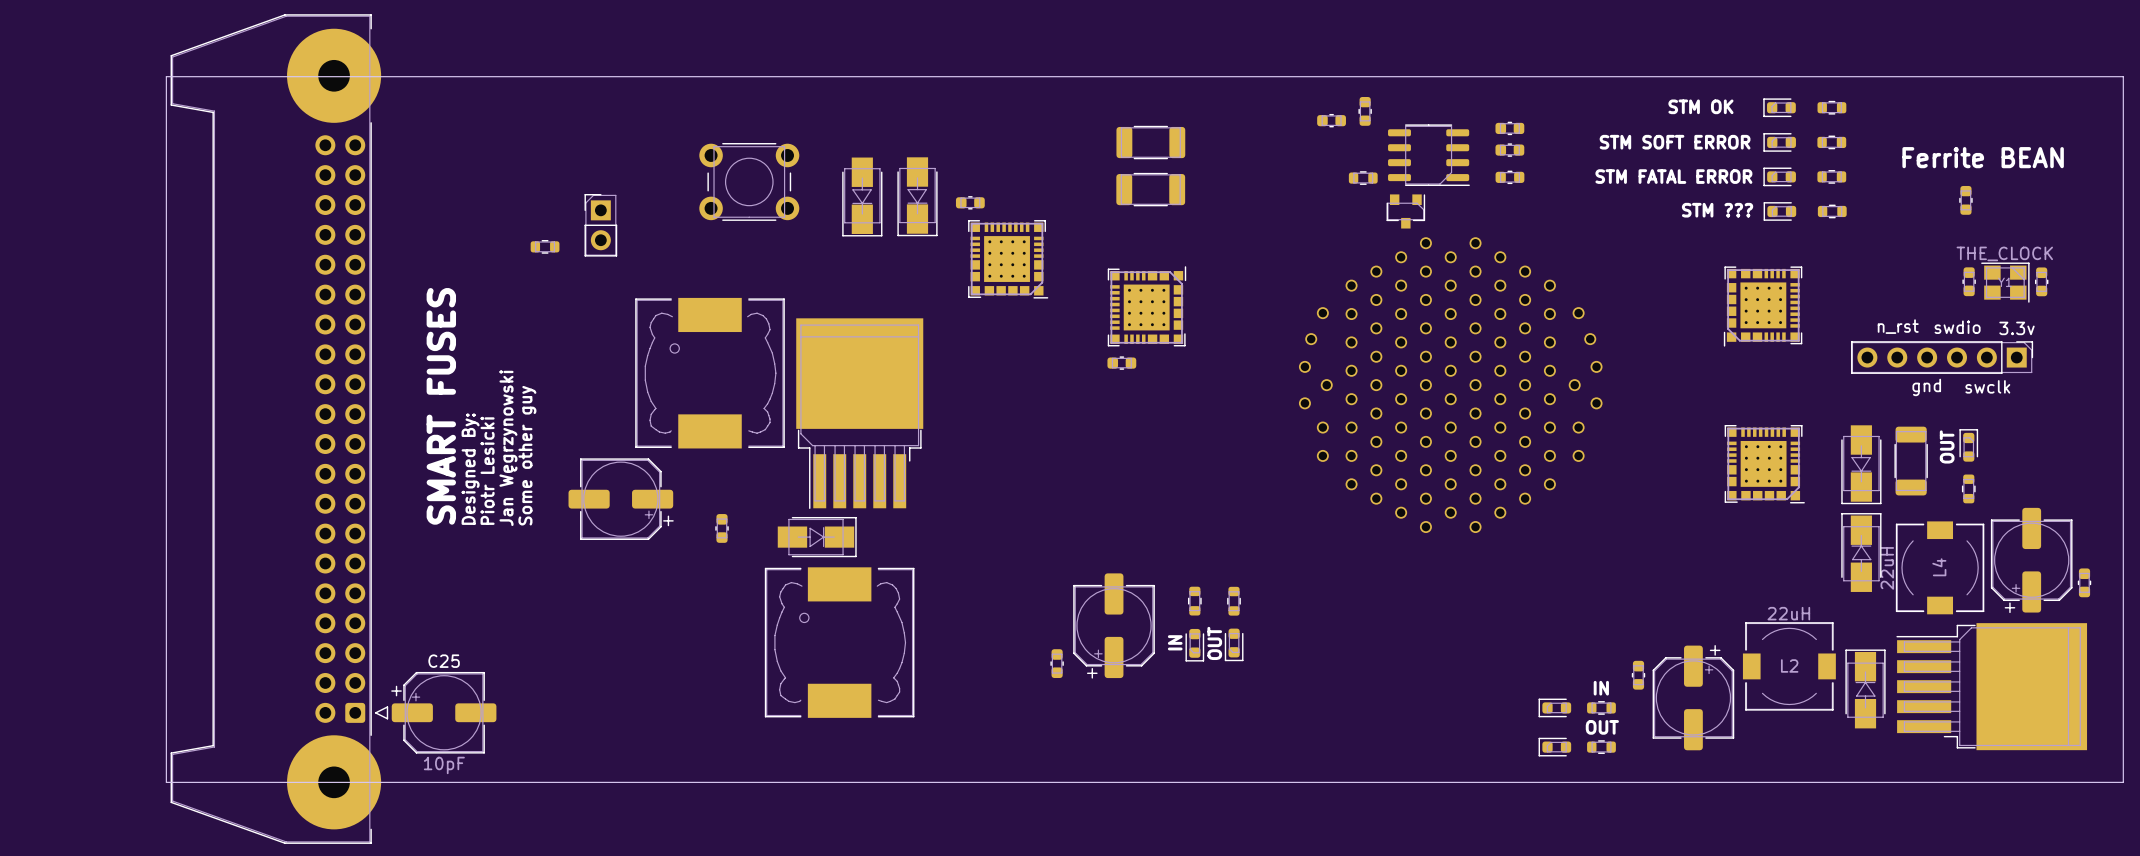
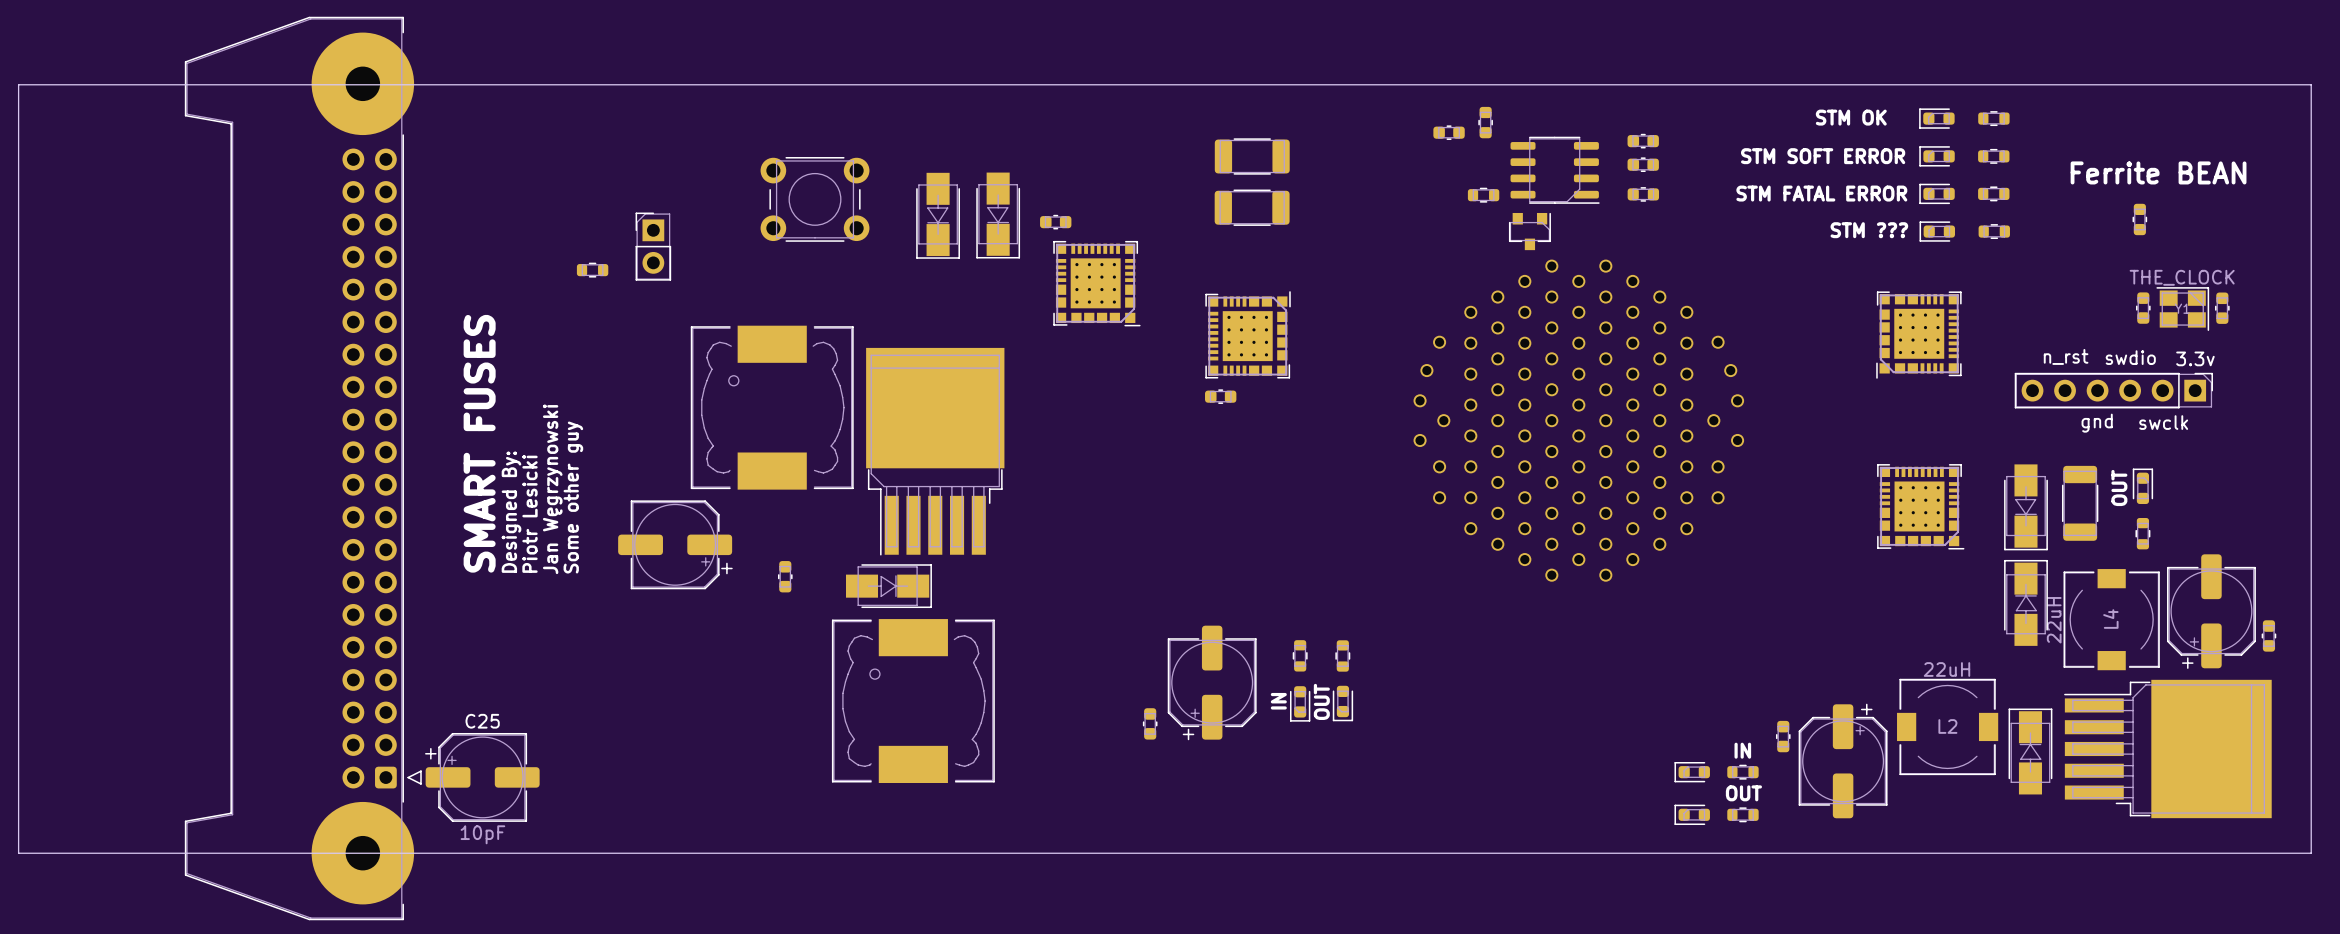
board edge: (166, 76) (166, 782) -> (180, 84) (18, 84) (18, 853) (180, 853)

